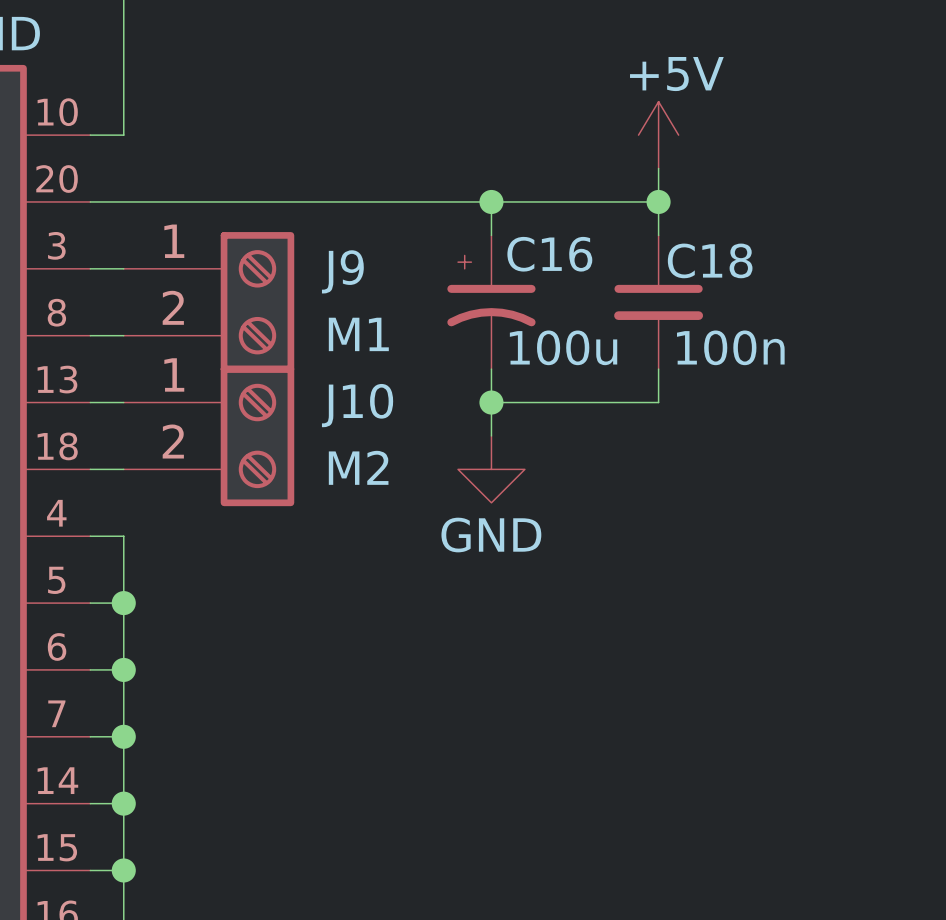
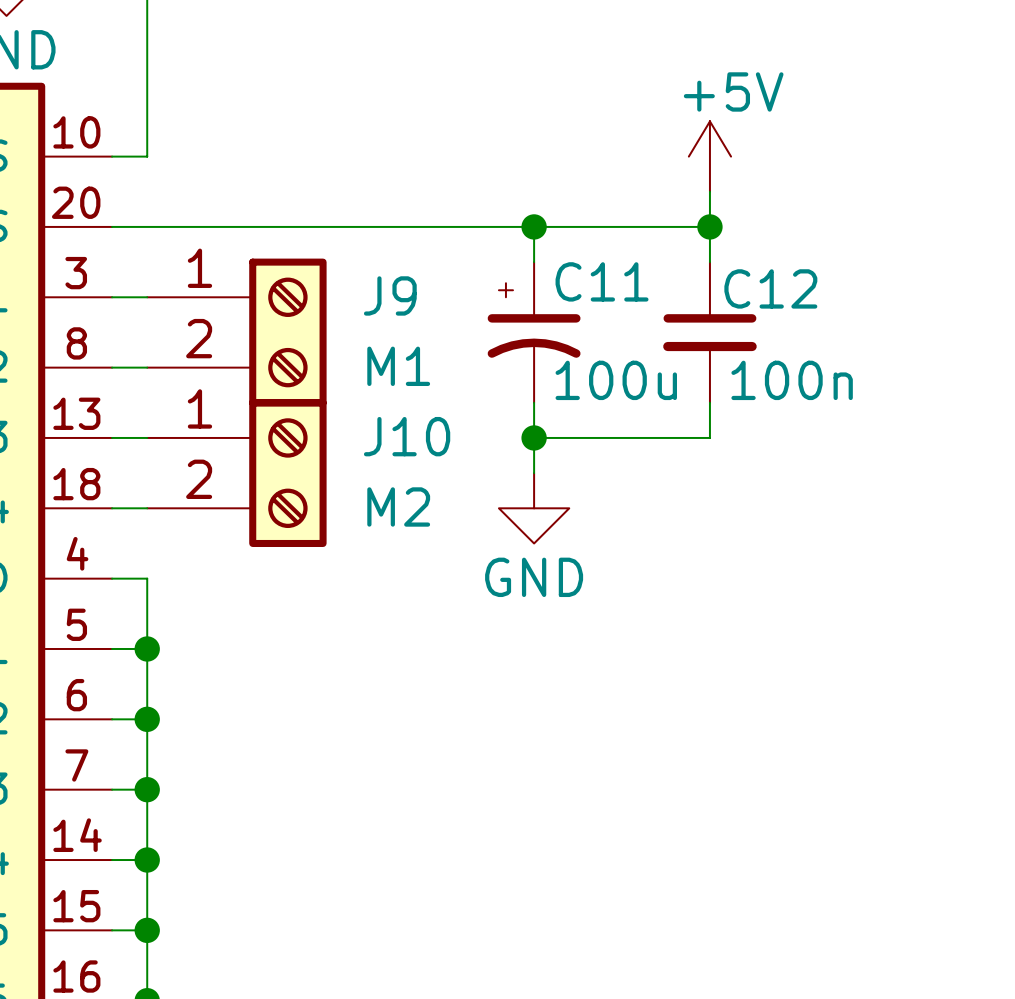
C16 name: C16 (549, 254) -> C11 (602, 281)
C18 name: C18 (710, 260) -> C12 (770, 288)

